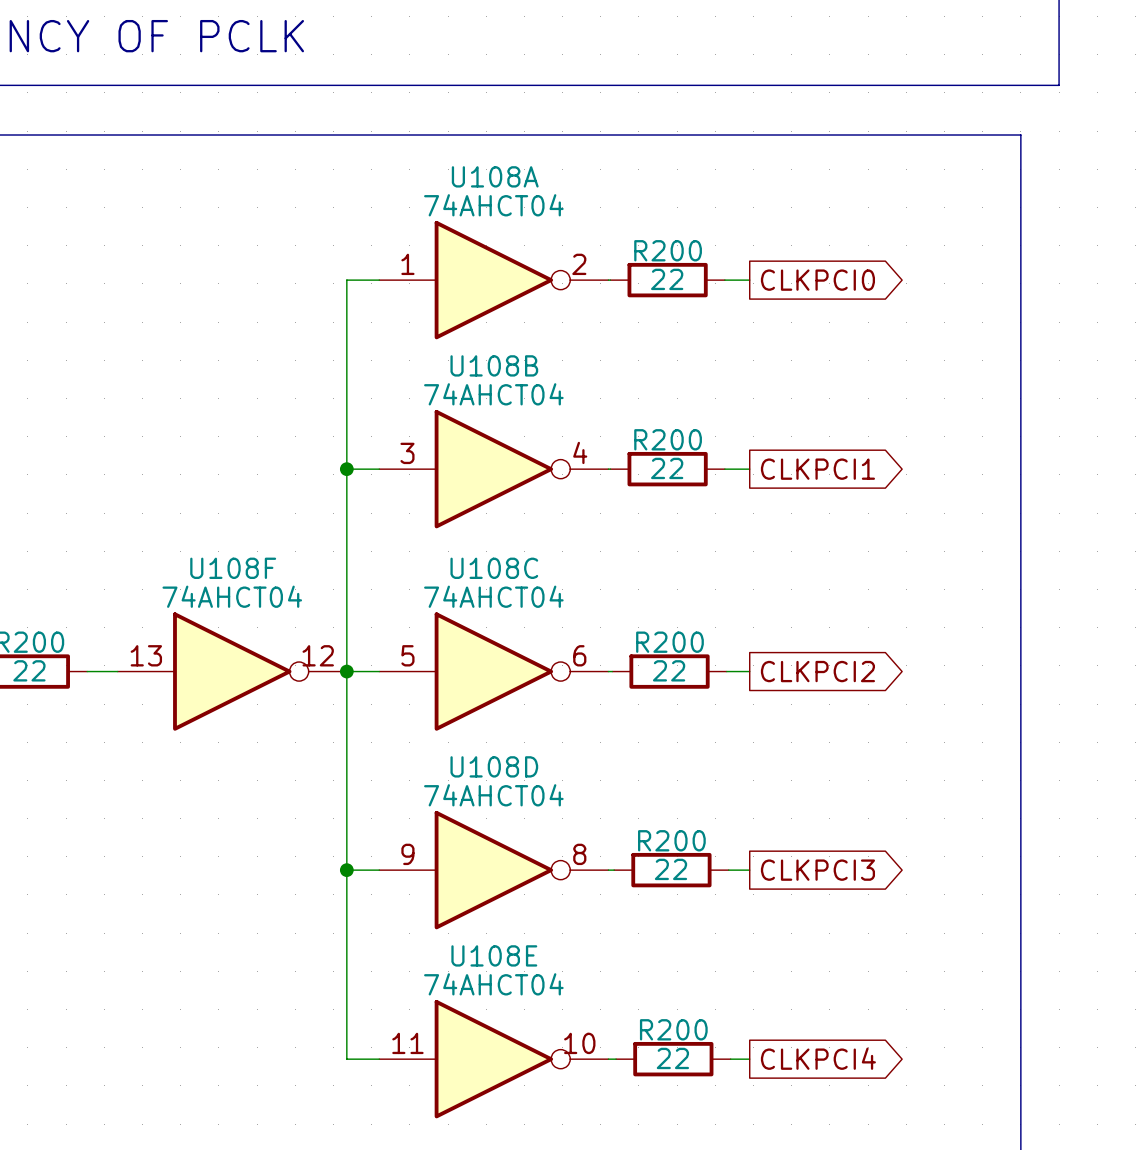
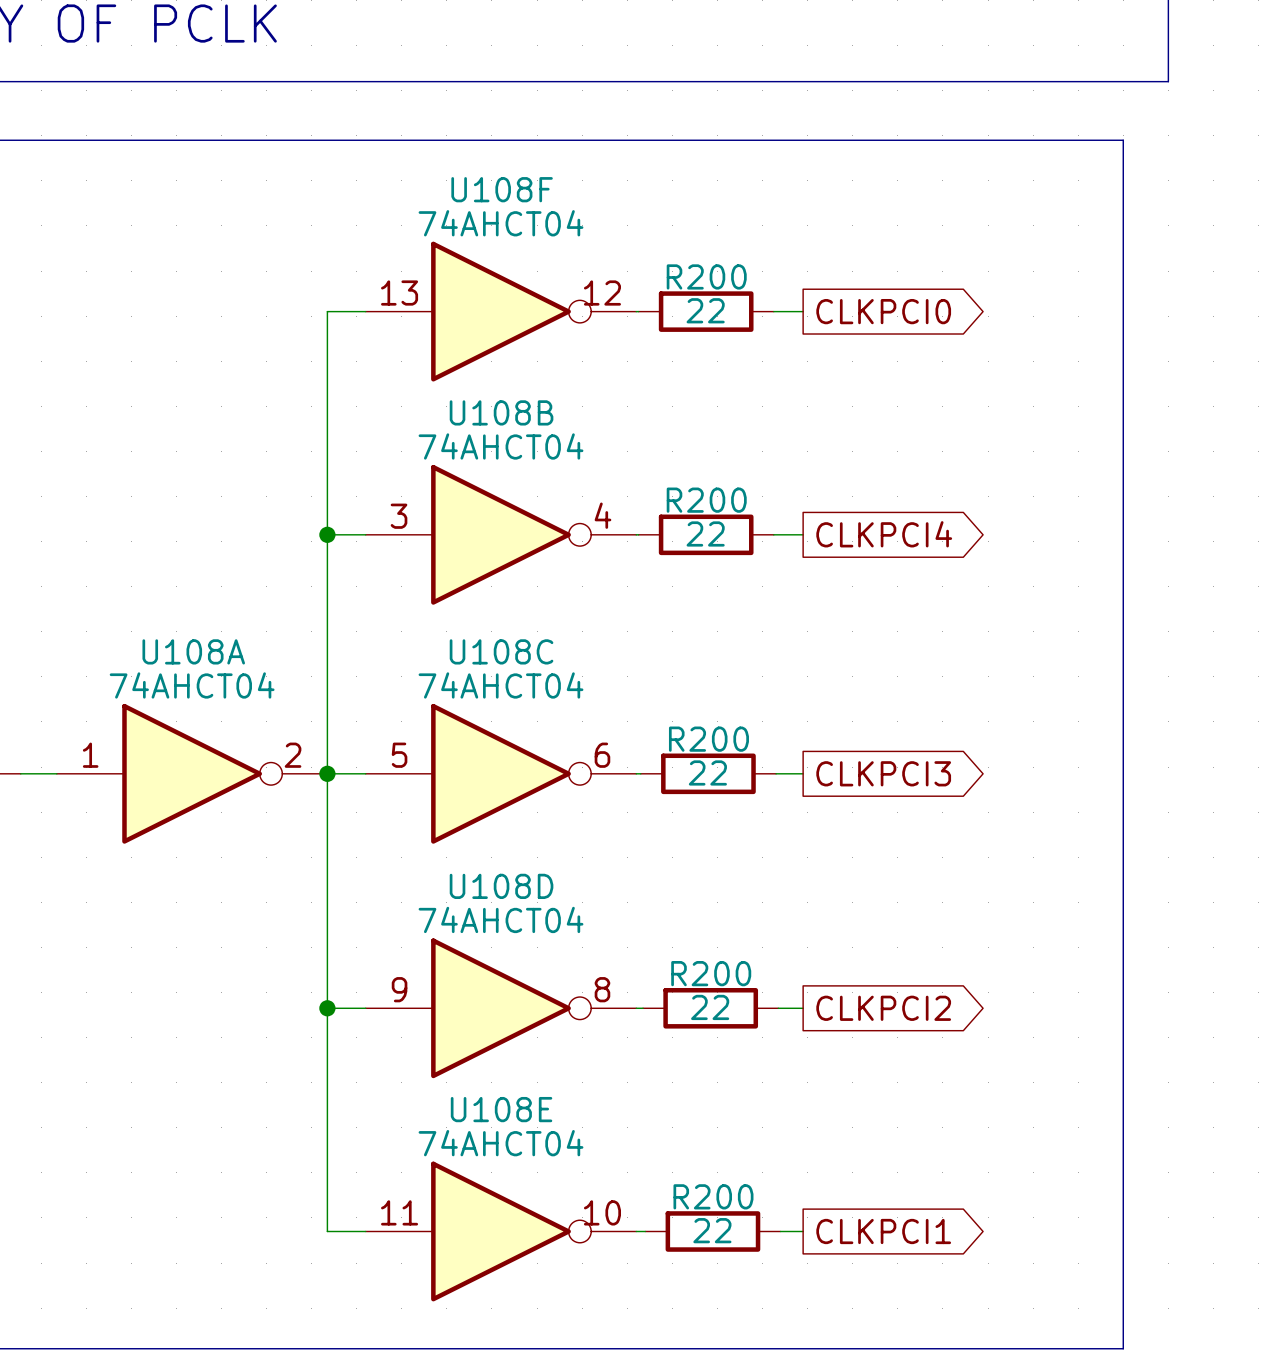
U108A position: (493, 280) -> (192, 773)
global label: CLKPCI1 (817, 469) -> CLKPCI4 (884, 534)
U108F position: (232, 671) -> (501, 311)
global label: CLKPCI2 (817, 671) -> CLKPCI3 (883, 773)
global label: CLKPCI3 (817, 870) -> CLKPCI2 (883, 1008)
global label: CLKPCI4 (818, 1058) -> CLKPCI1 (883, 1231)

